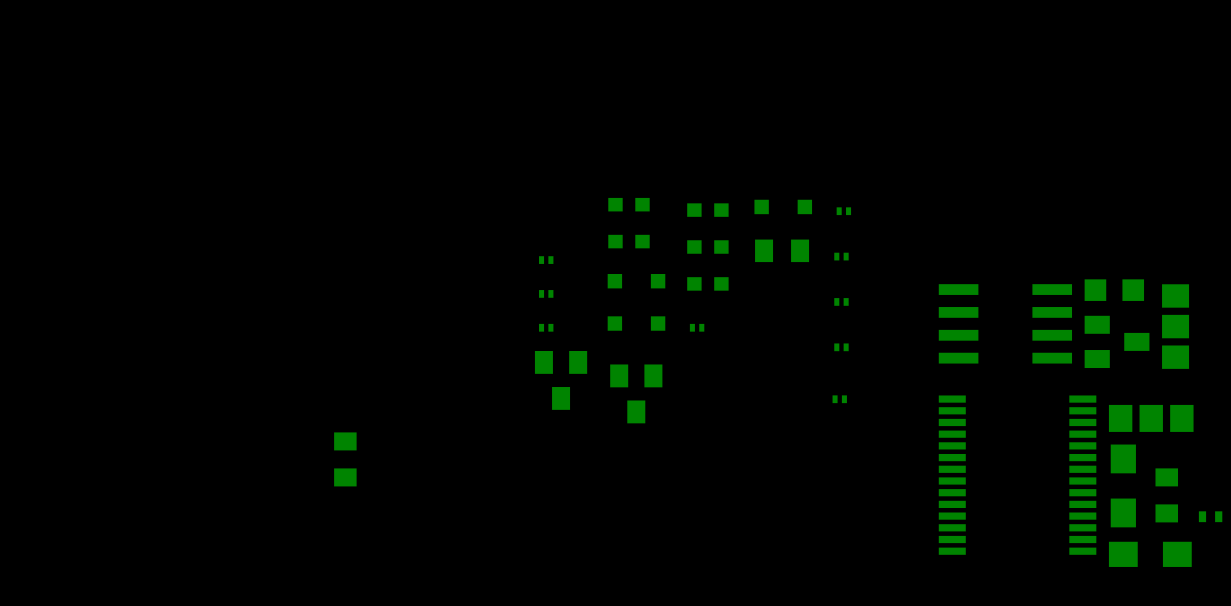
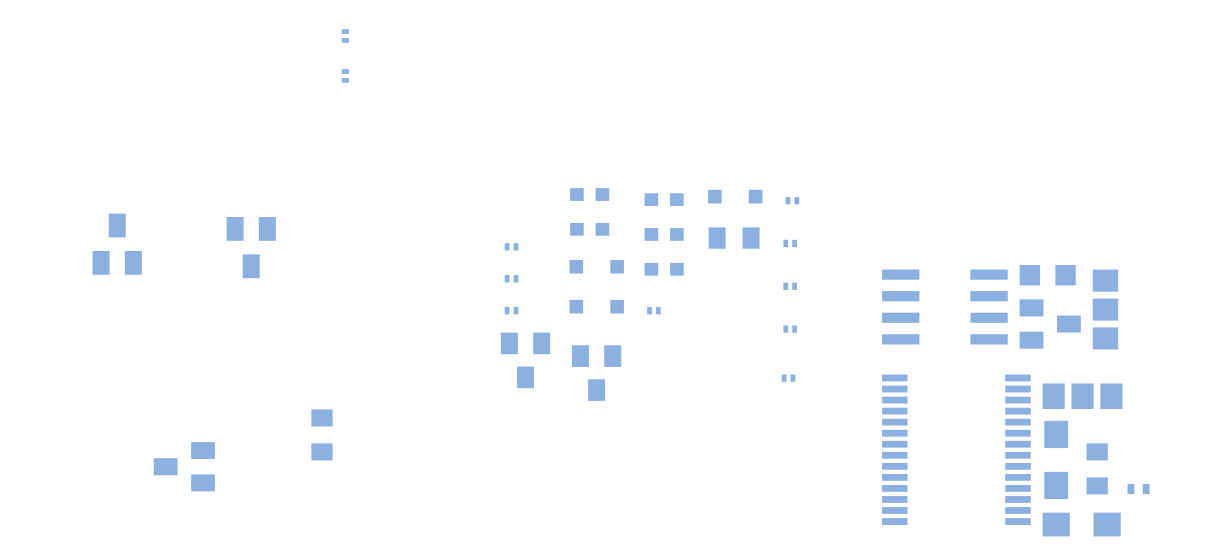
part: none -> (345, 36)
part: none -> (345, 75)
part: none -> (117, 244)
part: none -> (251, 247)
part: none -> (184, 466)

